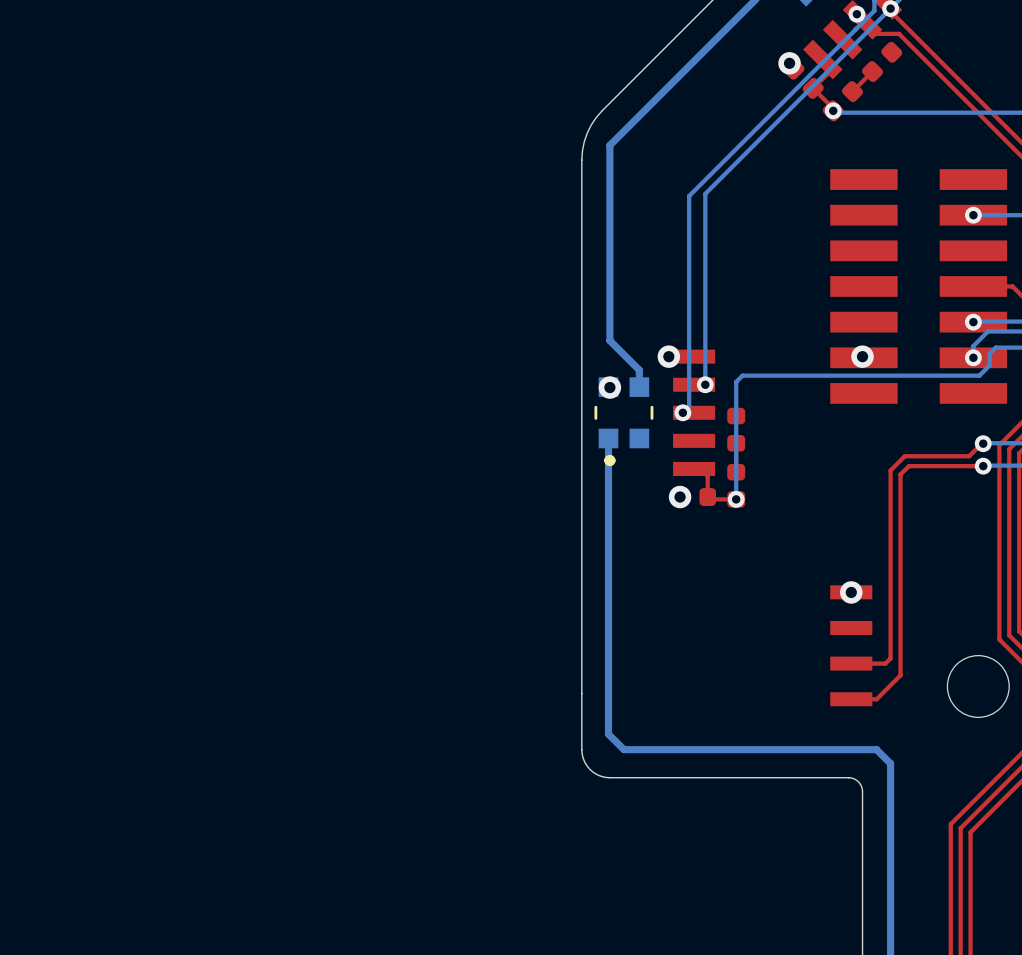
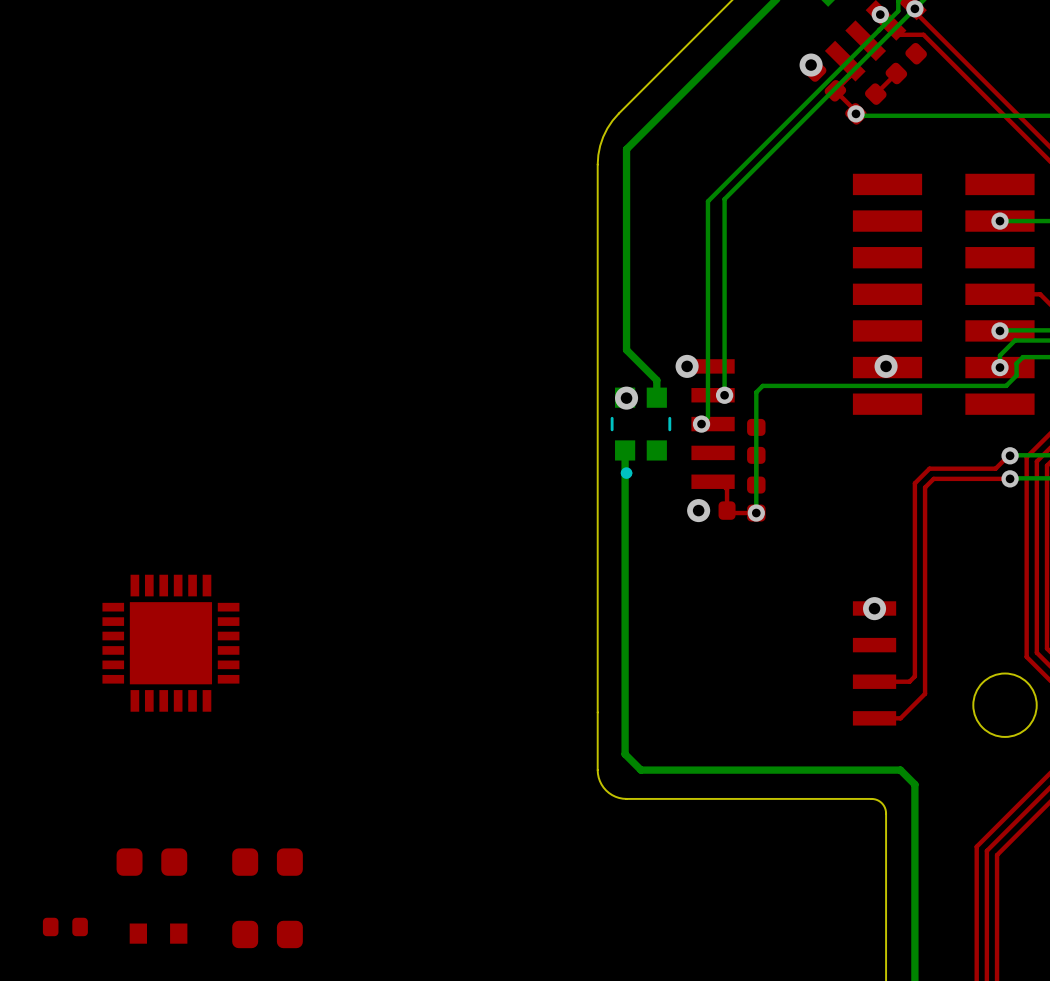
part: none -> (170, 643)
part: none -> (151, 862)
part: none -> (267, 862)
part: none -> (65, 926)
part: none -> (158, 933)
part: none -> (267, 934)

